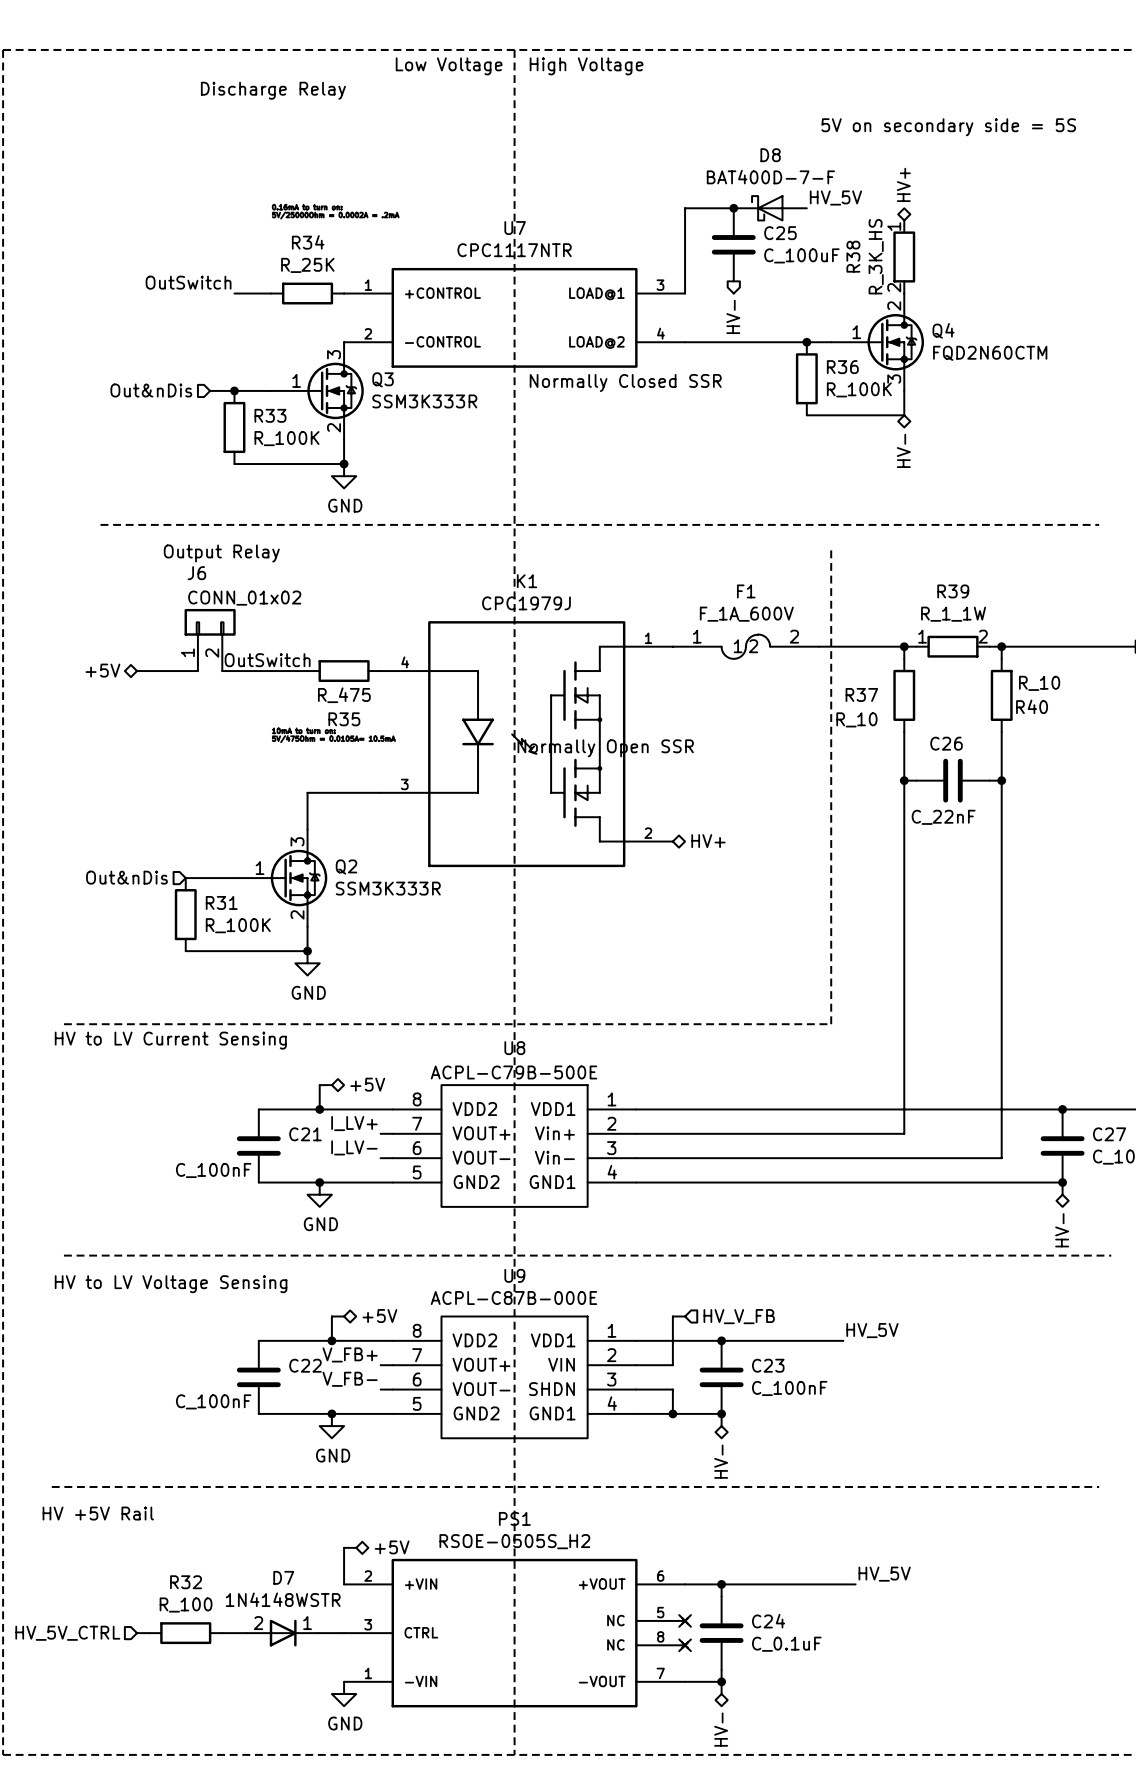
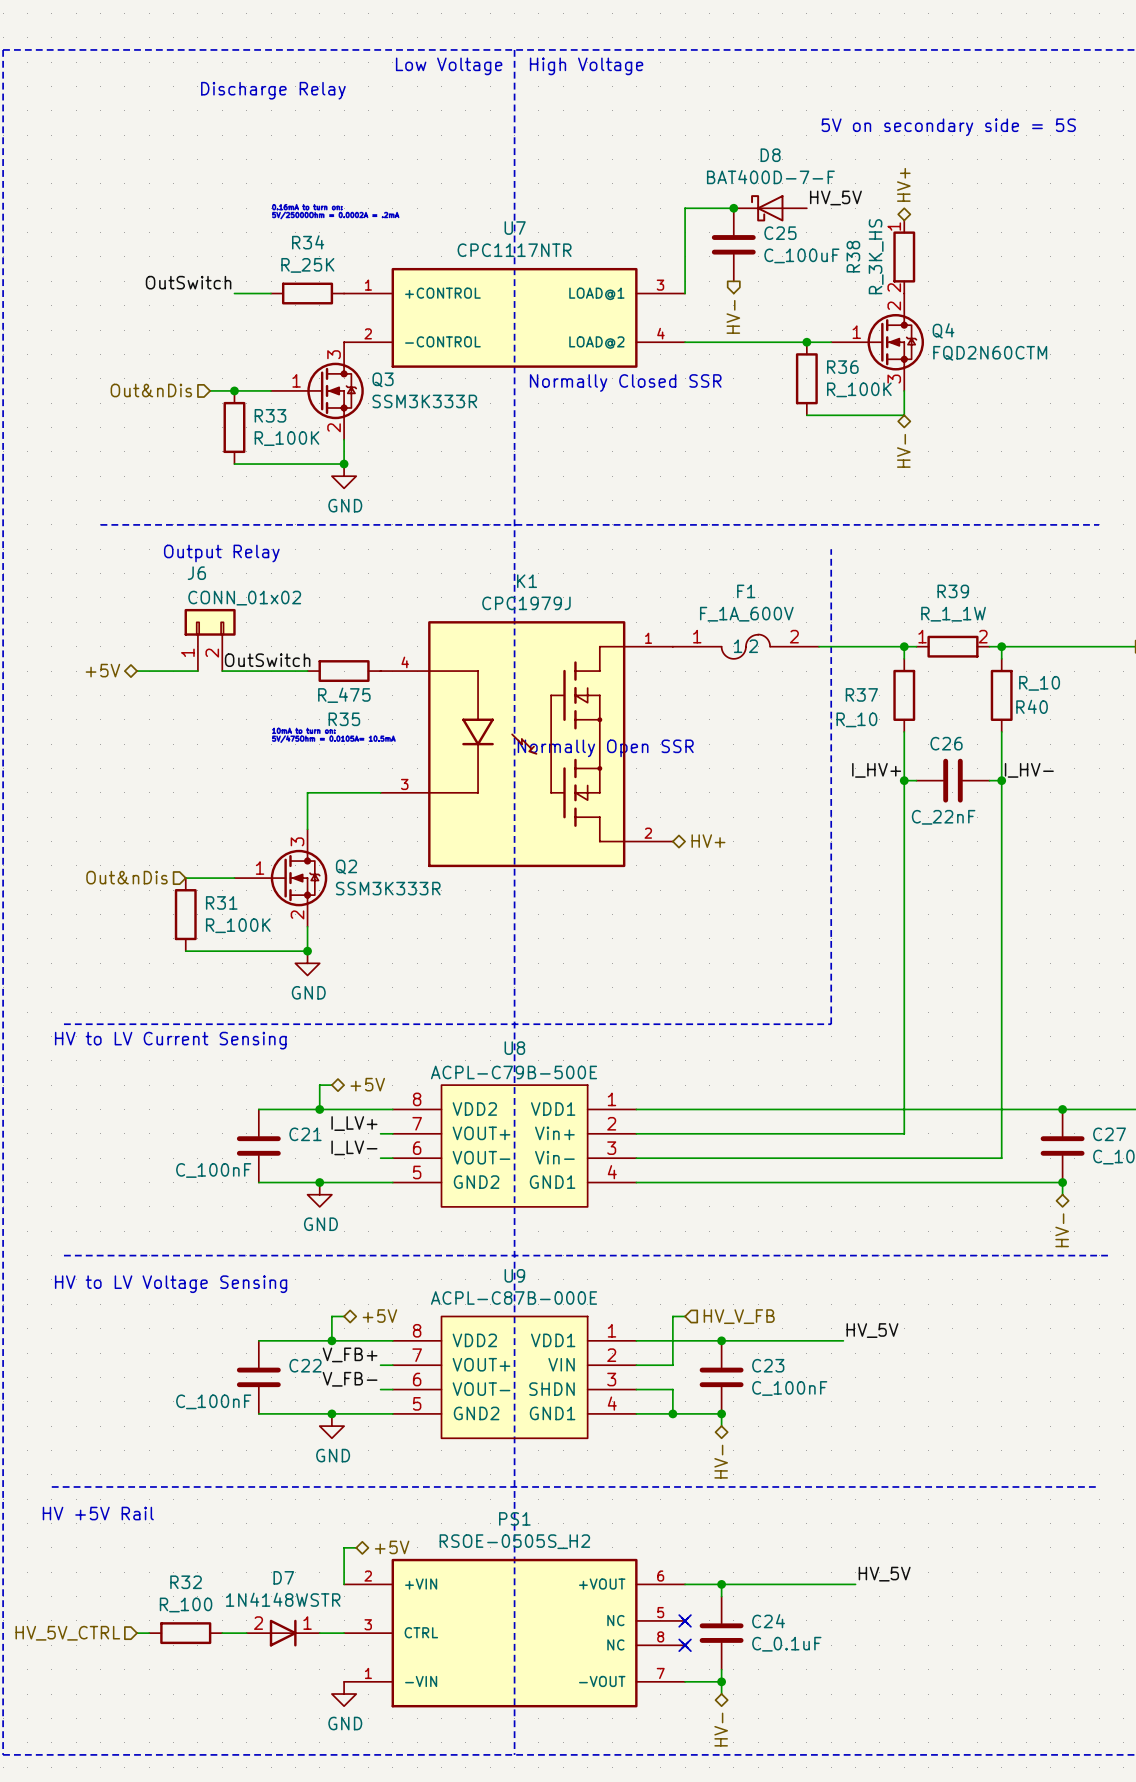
label: none -> I_HV+ (876, 770)
label: none -> I_HV- (1029, 770)

